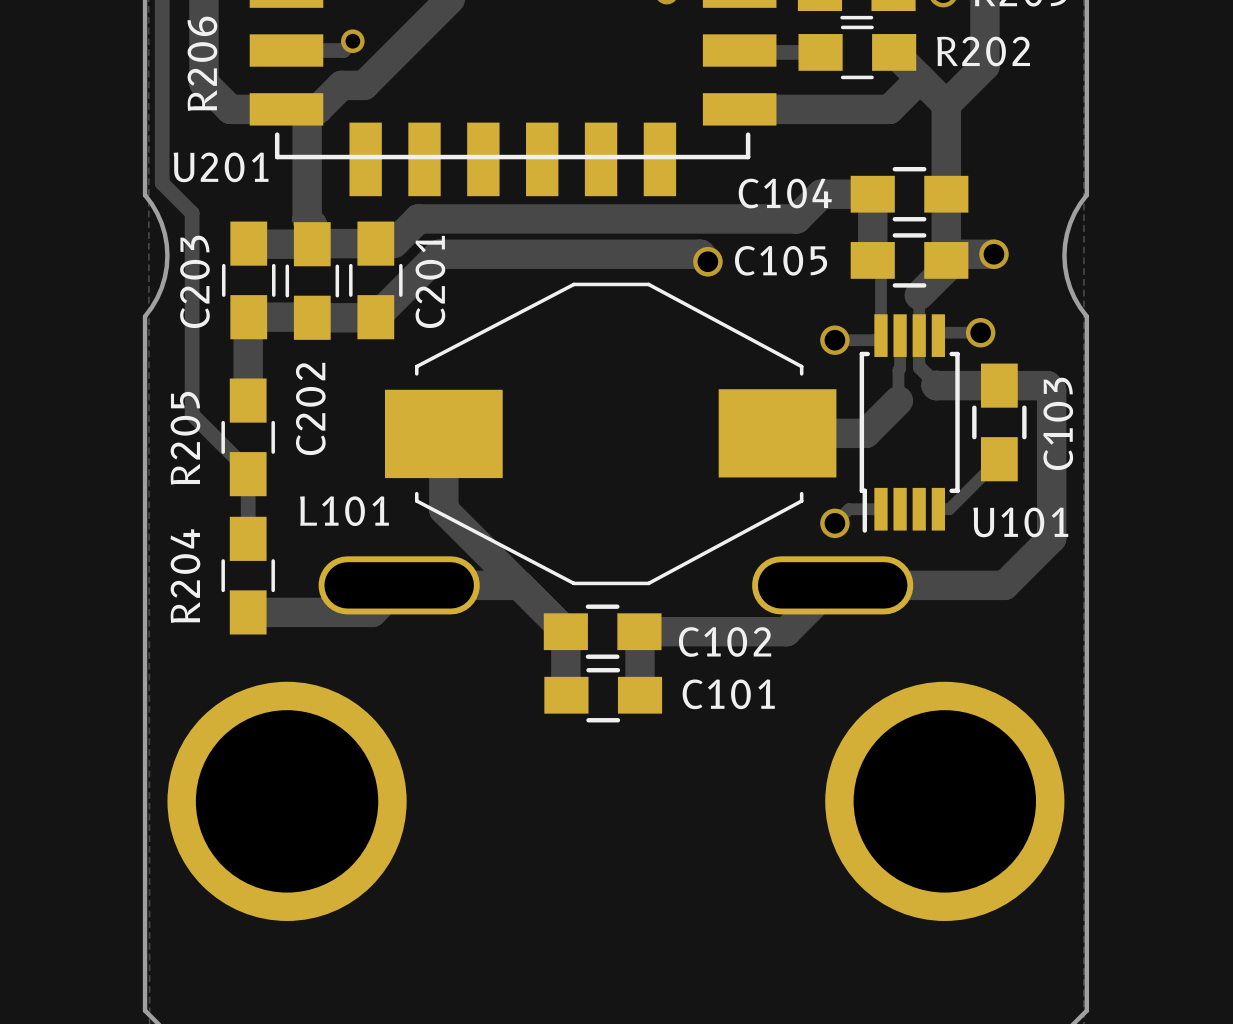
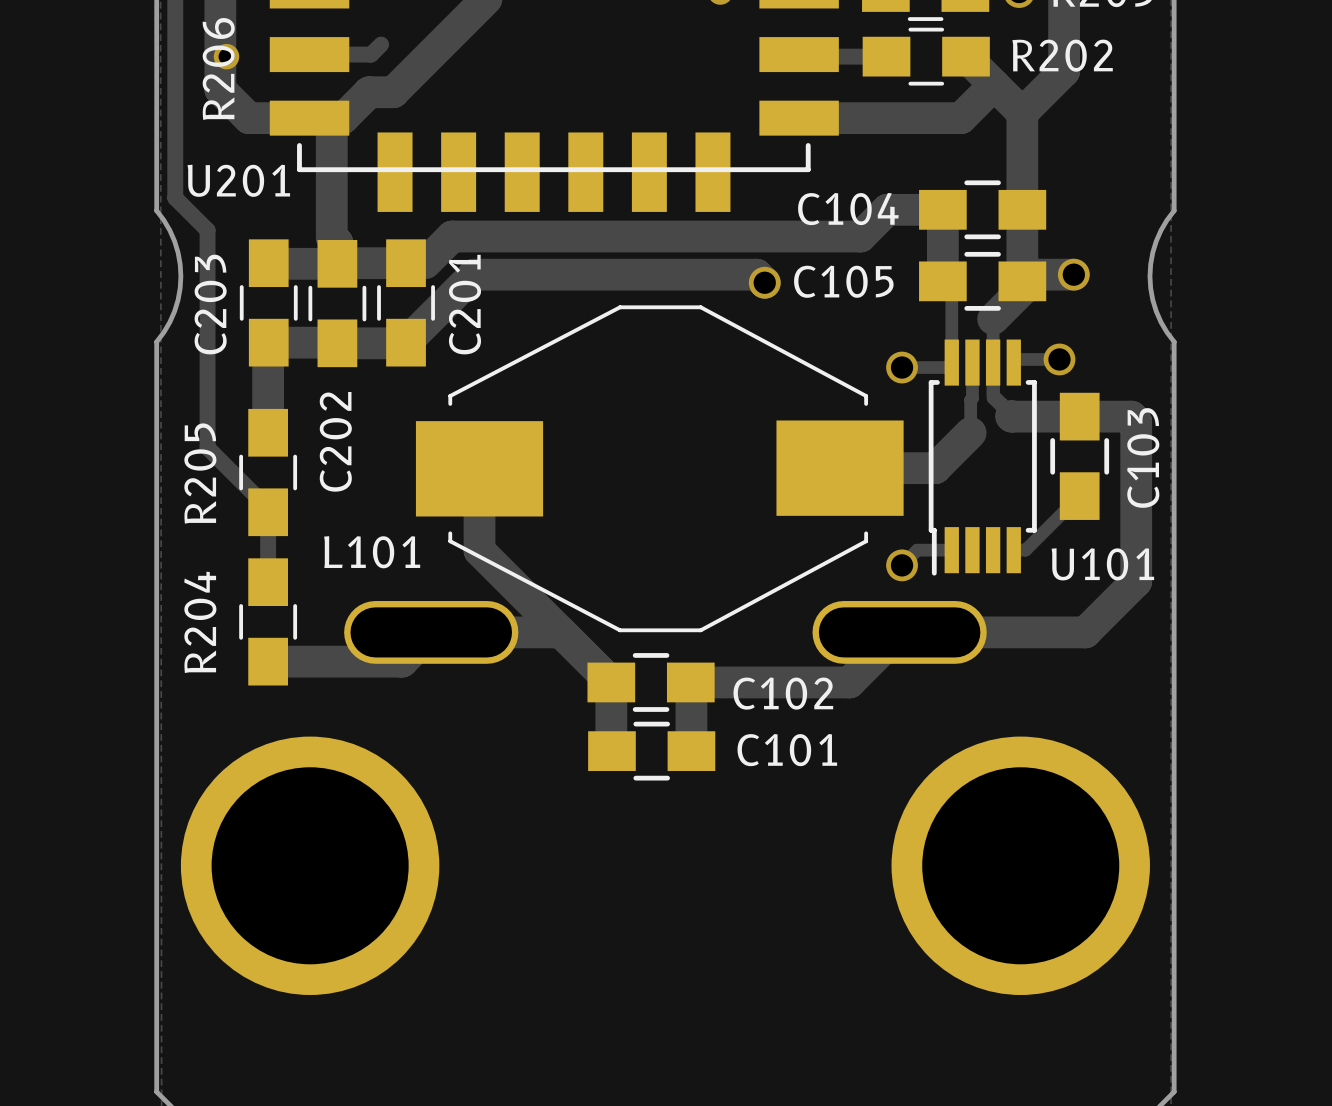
via: (352, 41) -> none
via: none -> (226, 56)

